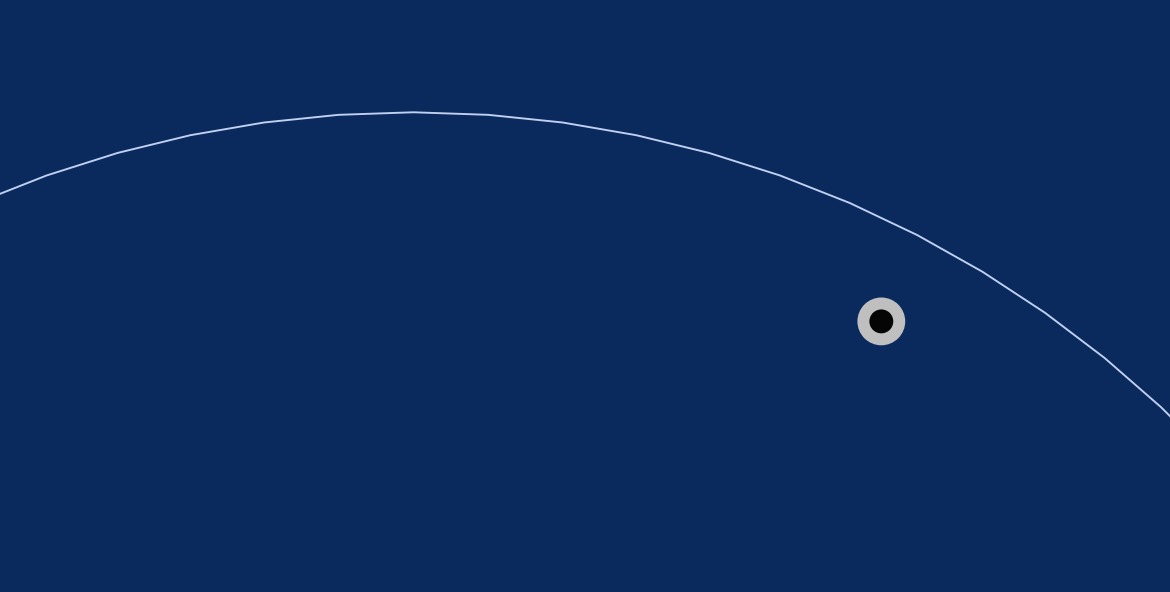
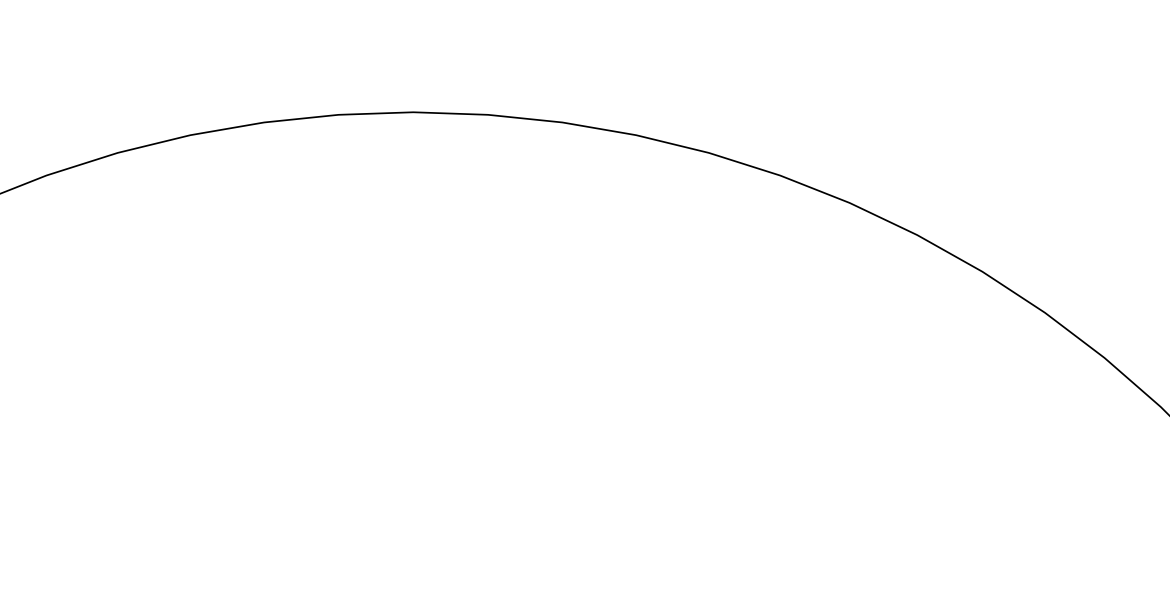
via: (881, 321) -> none

